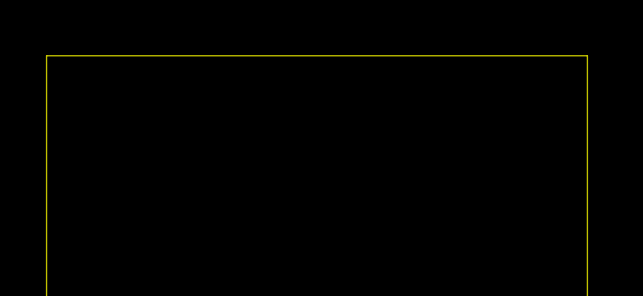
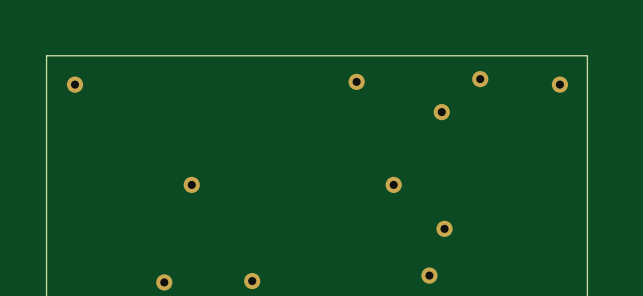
via: none -> (480, 79)
via: none -> (356, 81)
via: none -> (74, 84)
via: none -> (559, 84)
via: none -> (441, 112)
via: none -> (191, 184)
via: none -> (393, 184)
via: none -> (444, 228)
via: none -> (429, 275)
via: none -> (252, 281)
via: none -> (164, 282)

